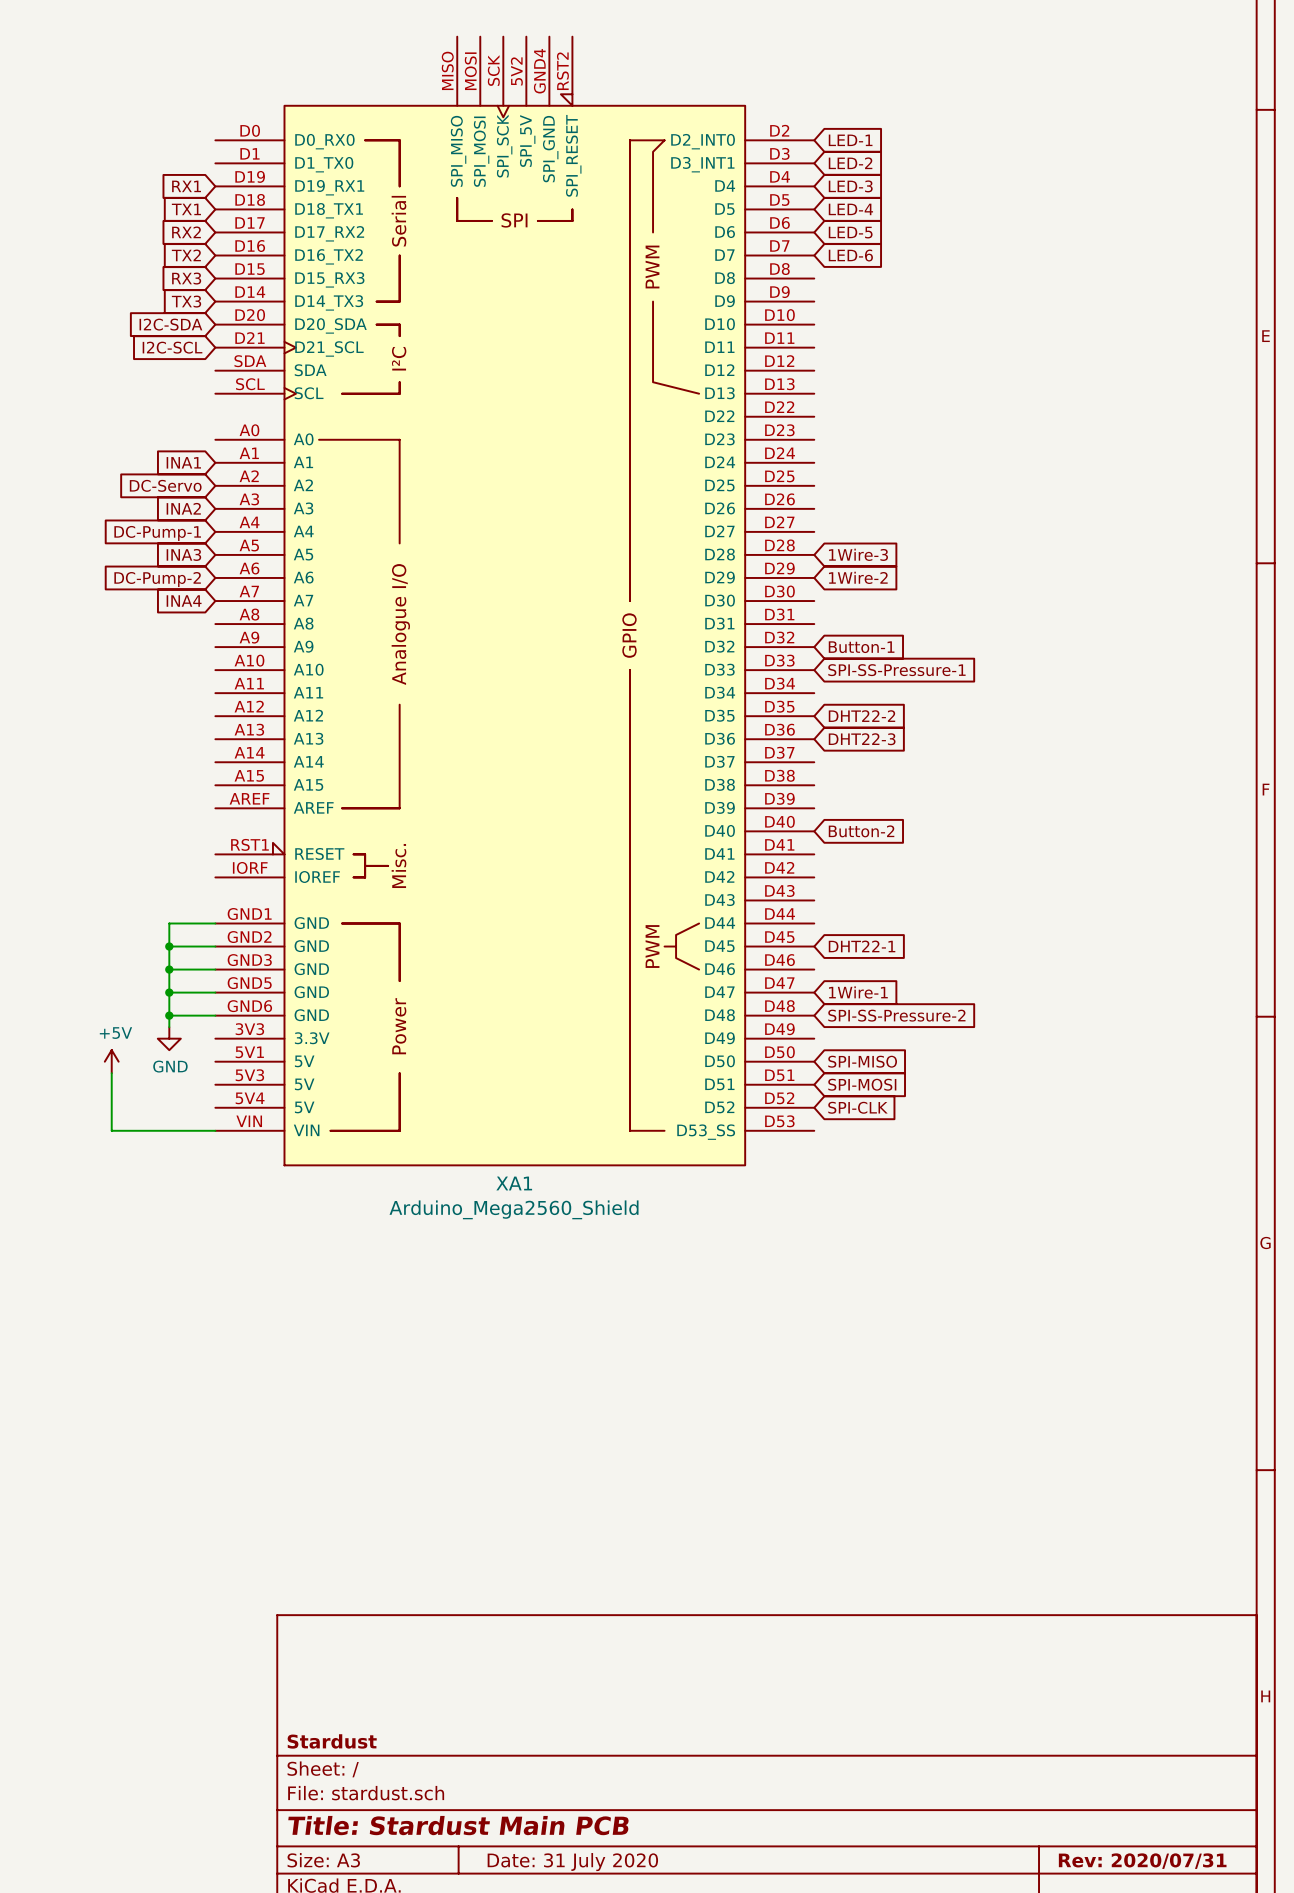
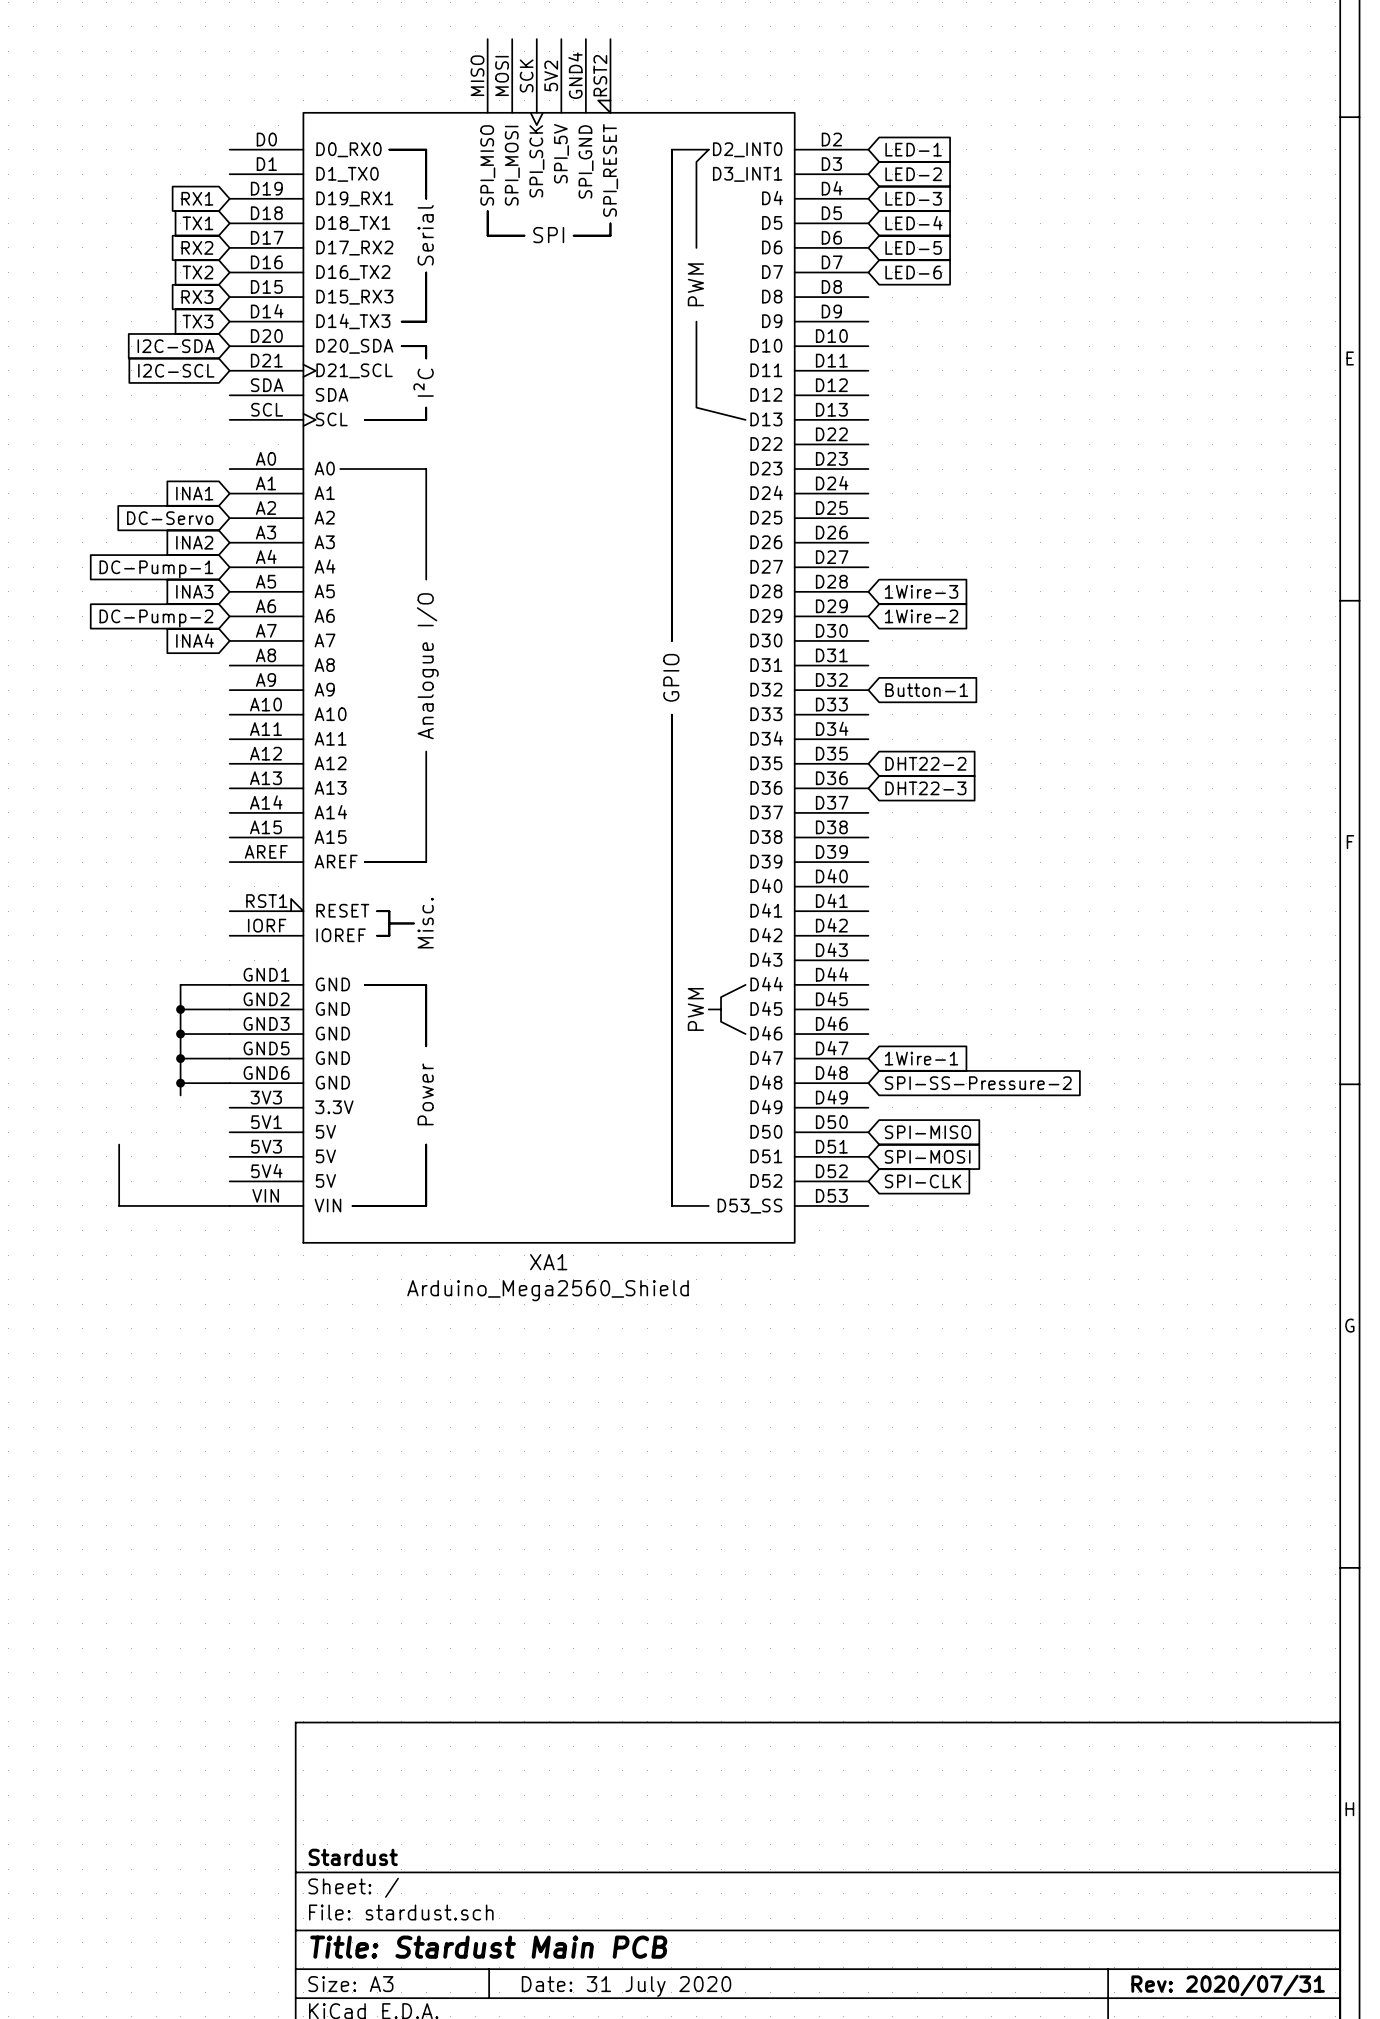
global label: SPI-SS-Pressure-1 (896, 670) -> none
global label: Button-2 (861, 831) -> none
global label: DHT22-1 (862, 946) -> none
power symbol: GND (169, 1038) -> none
power symbol: +5V (111, 1061) -> none

